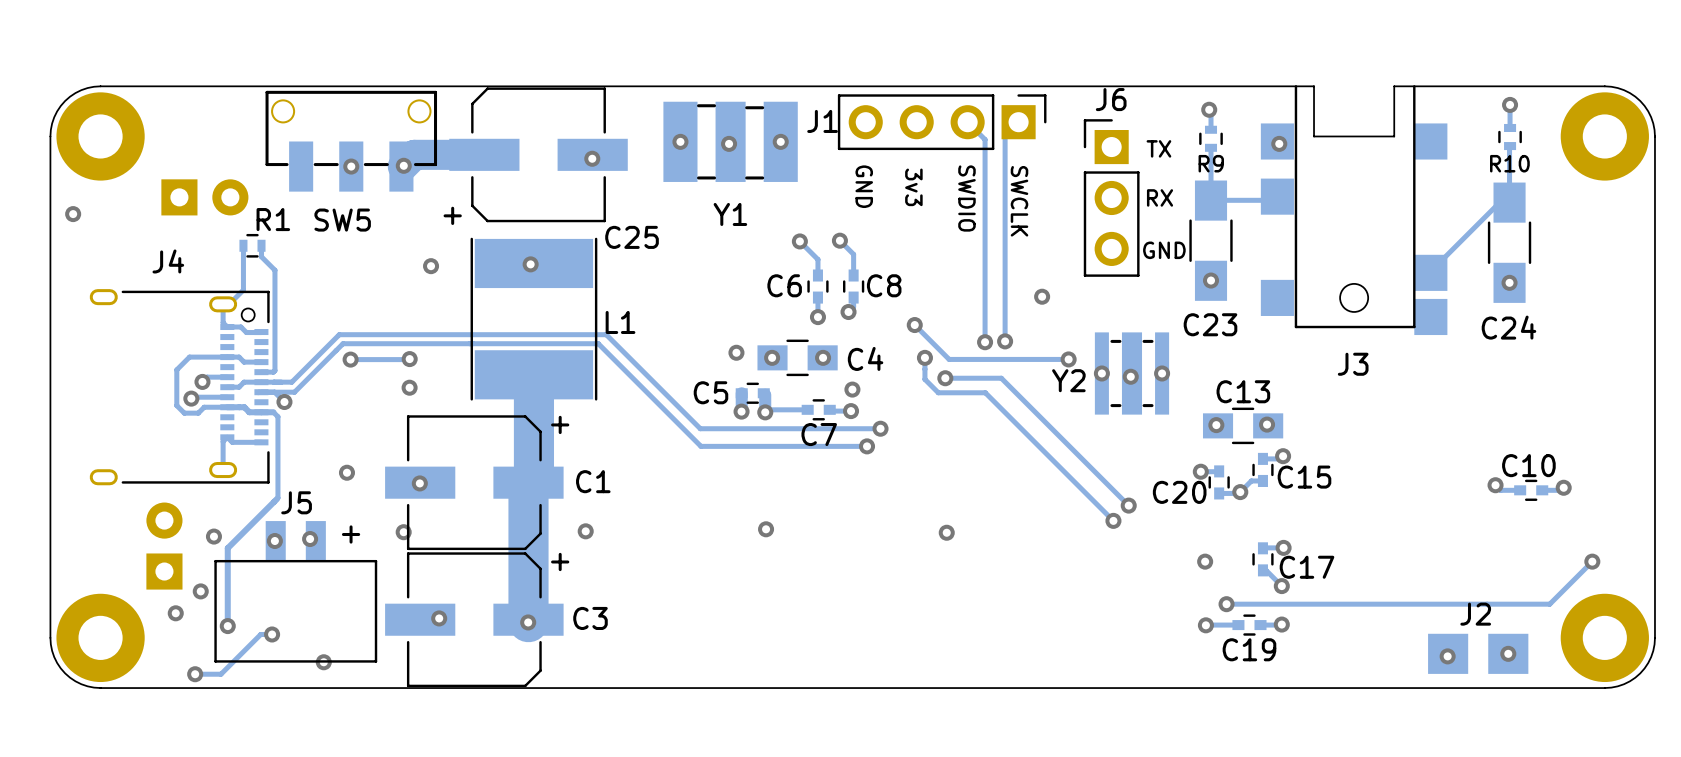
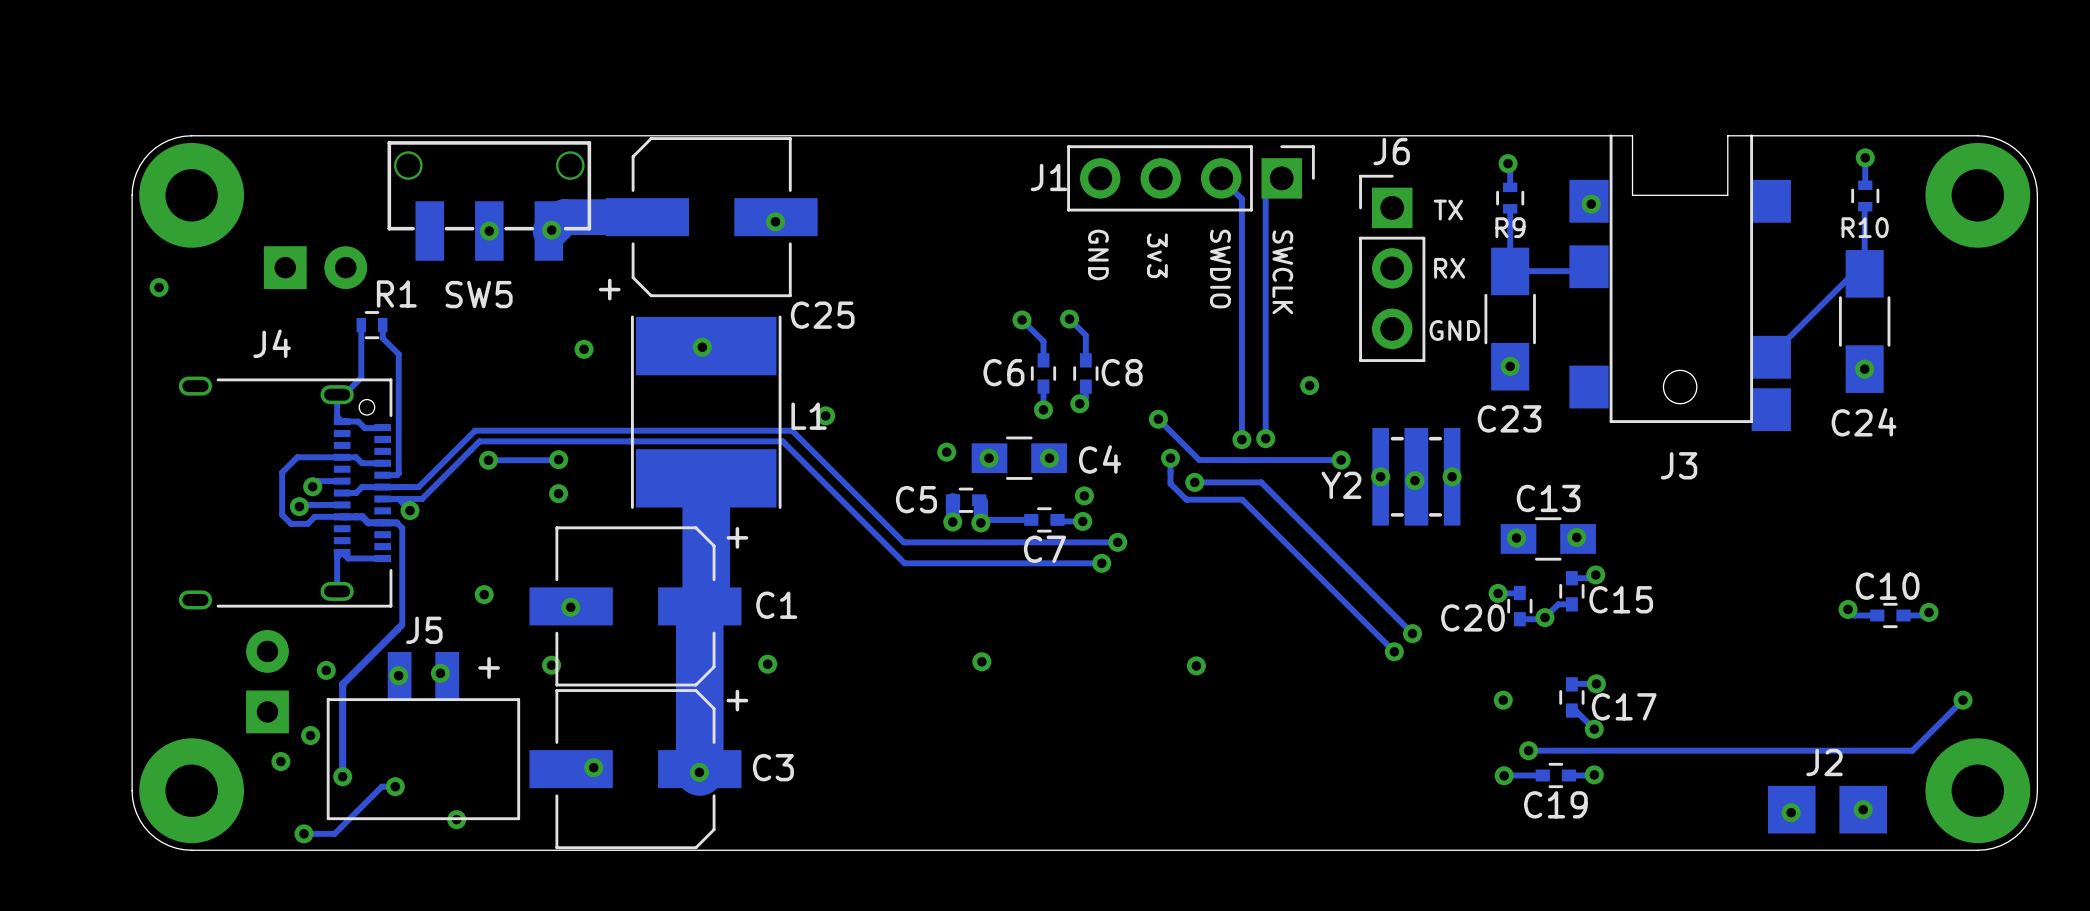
via: (680, 141) -> none
Y1: (730, 141) -> none
via: (780, 141) -> none
via: (729, 143) -> none
via: none -> (825, 415)

